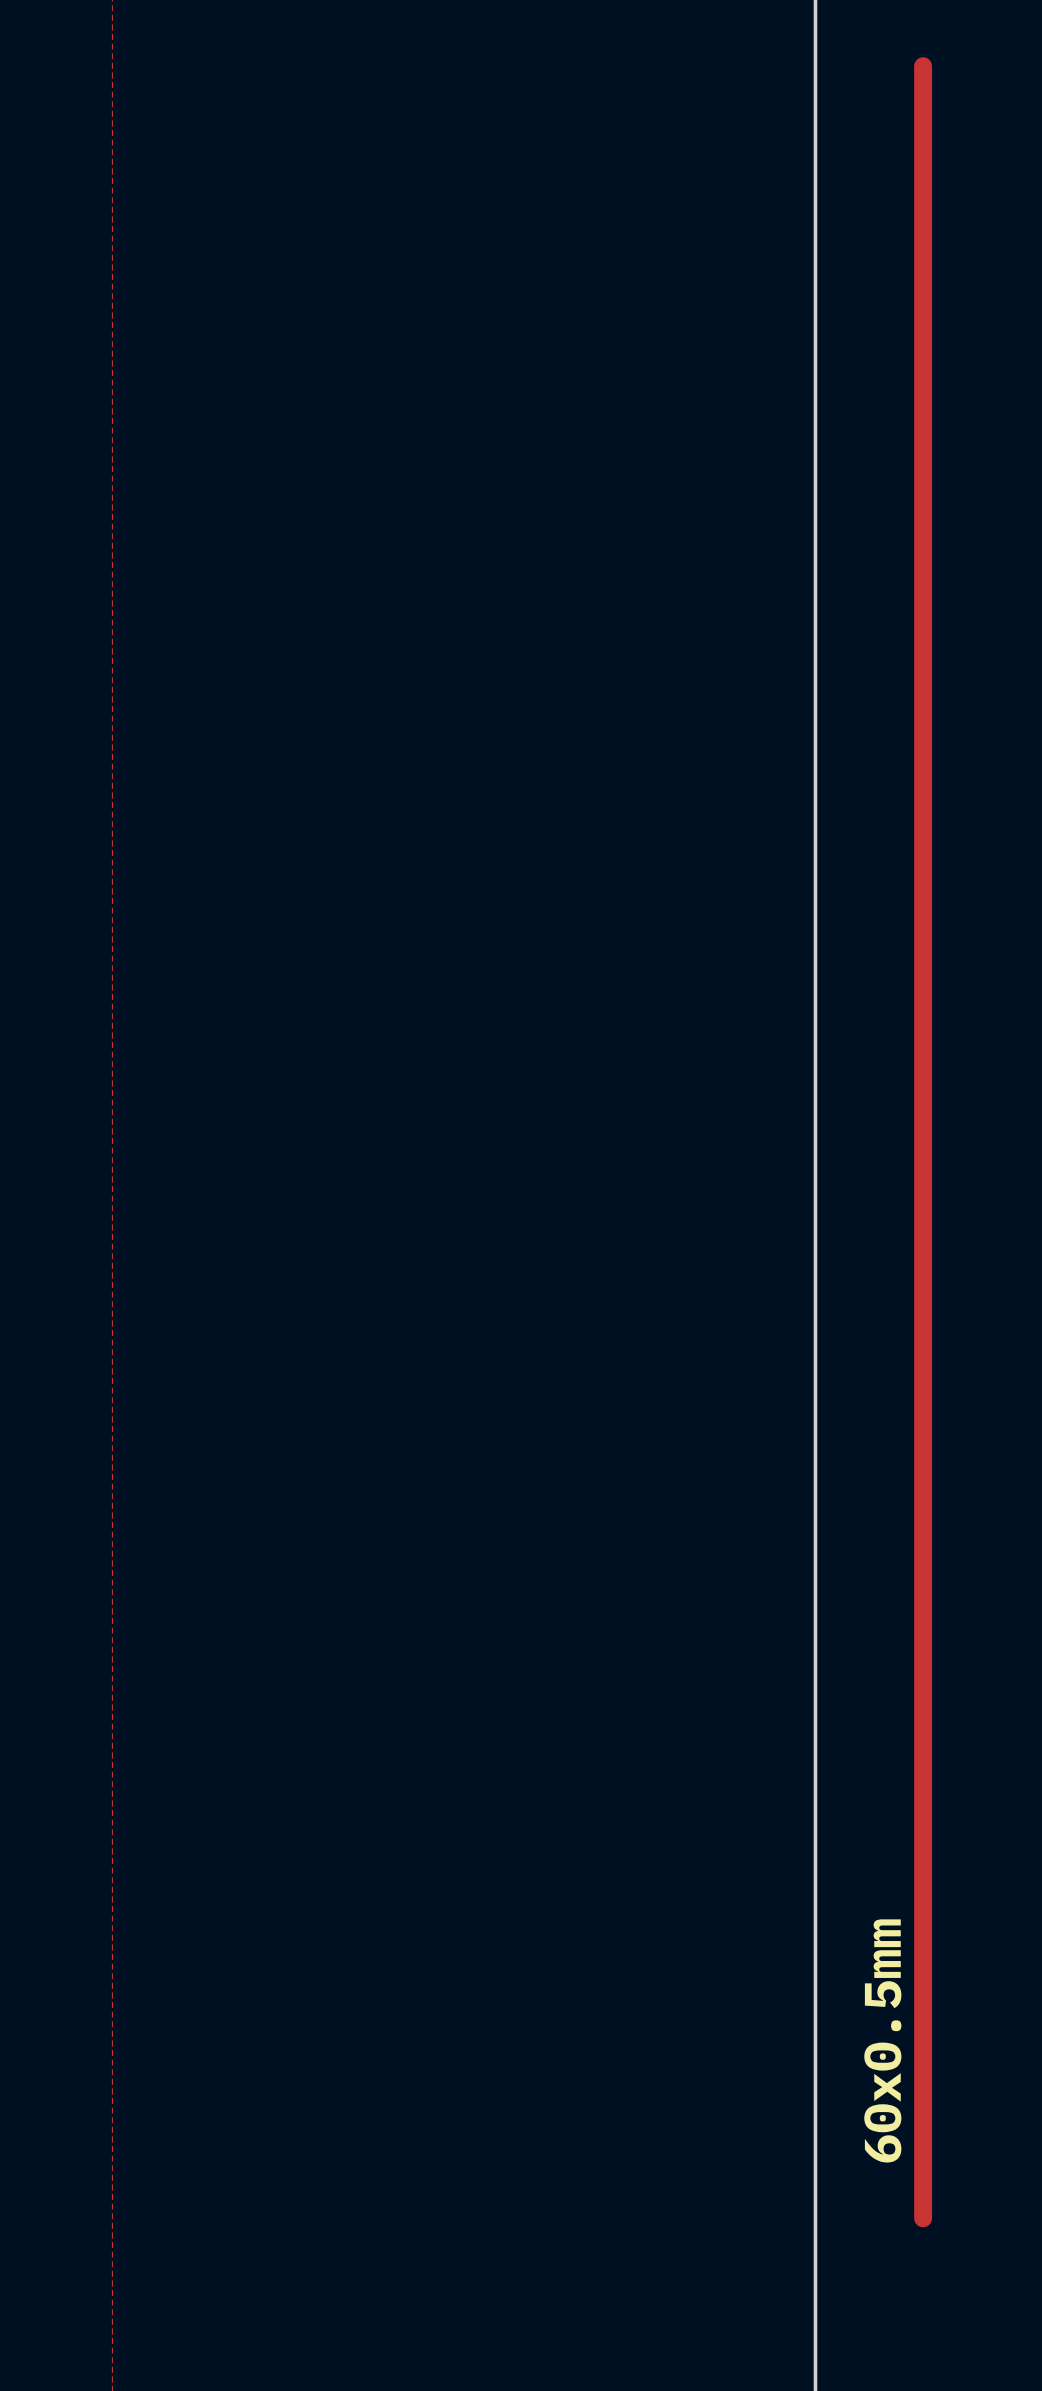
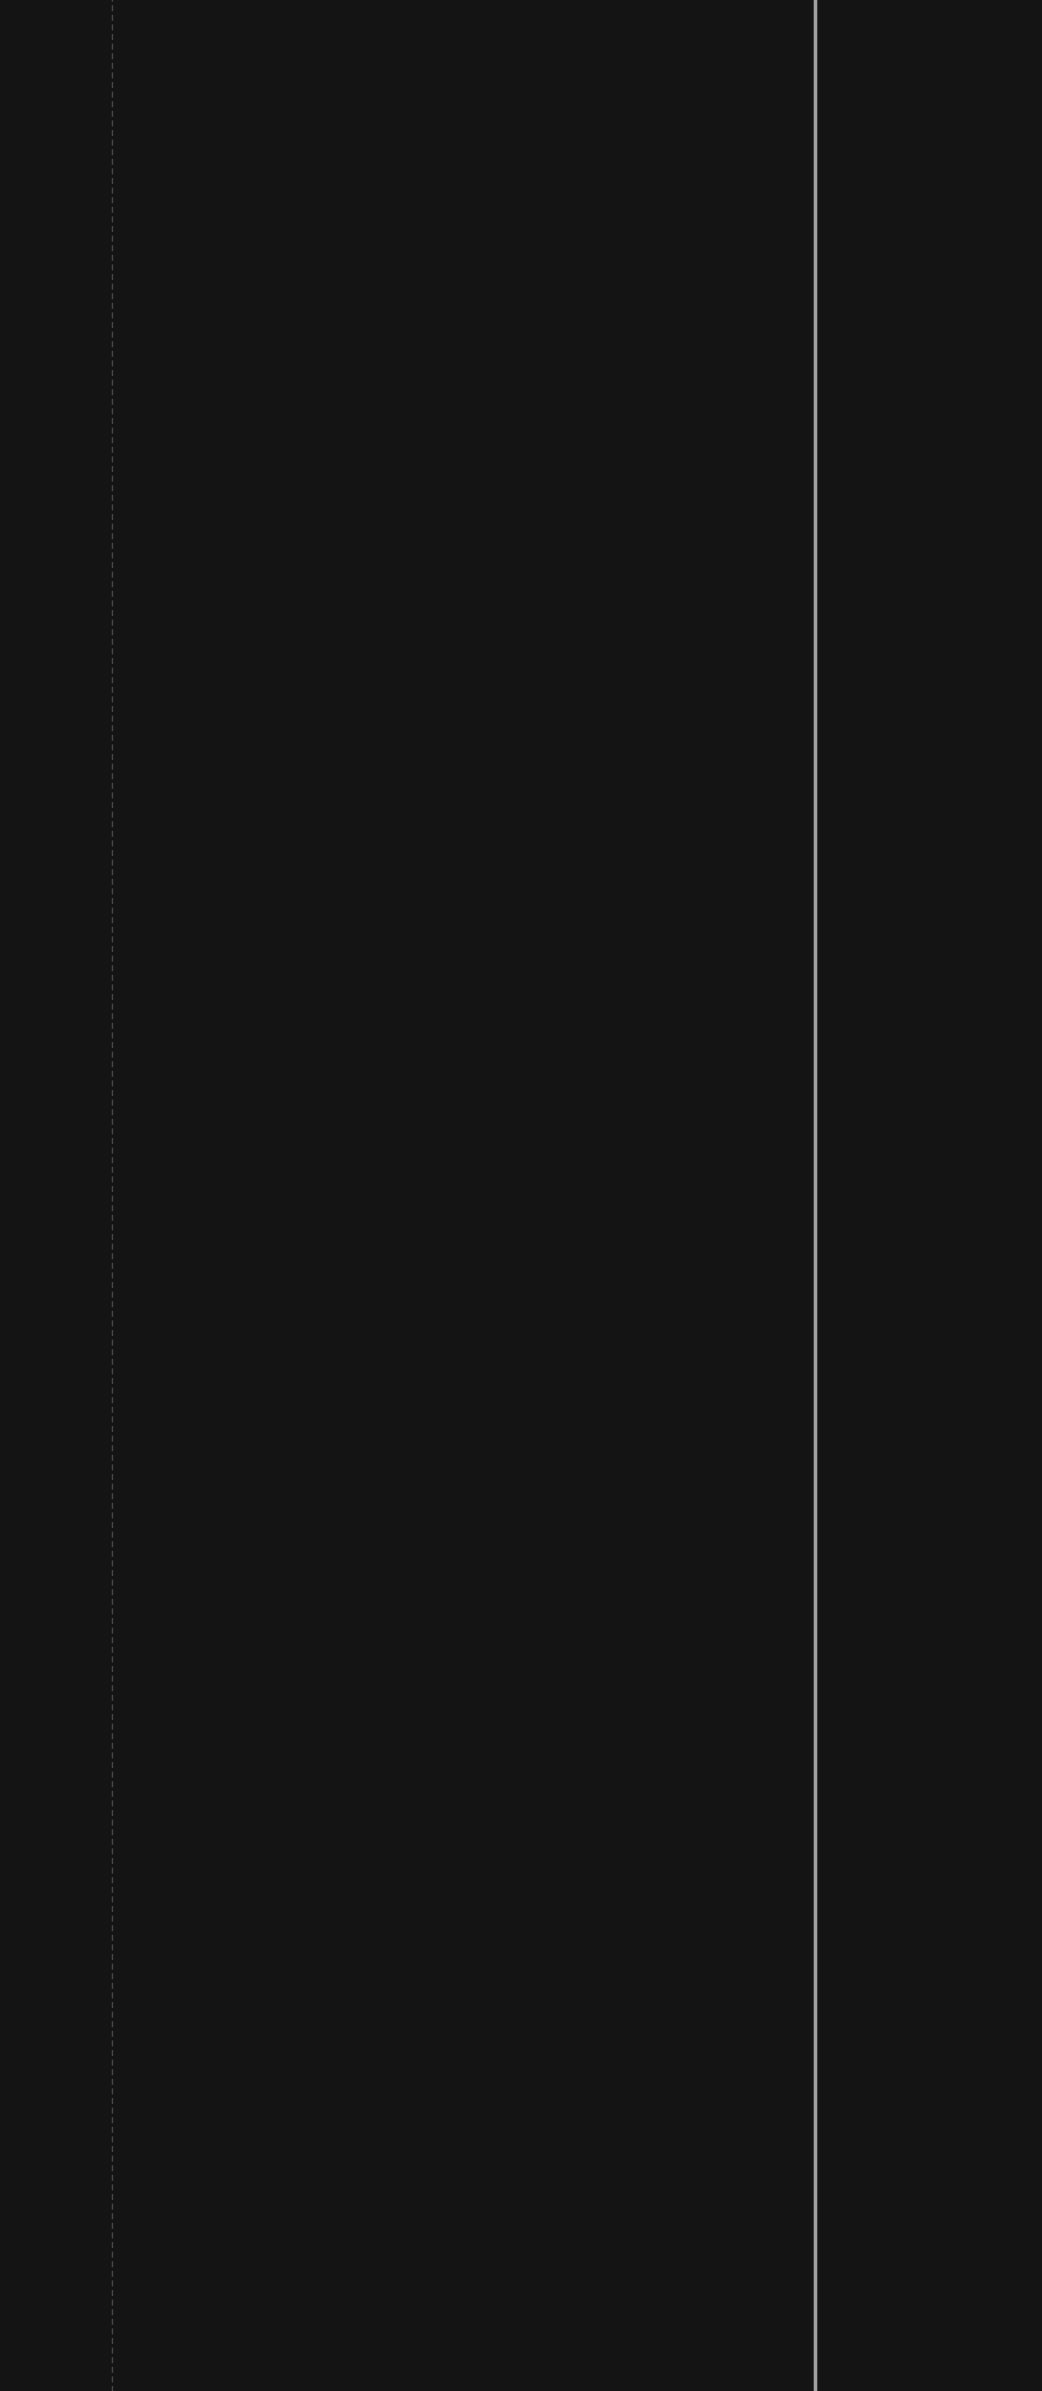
track: (923, 66) (923, 2218) -> none
text: 60x0.5mm (882, 2040) -> none

